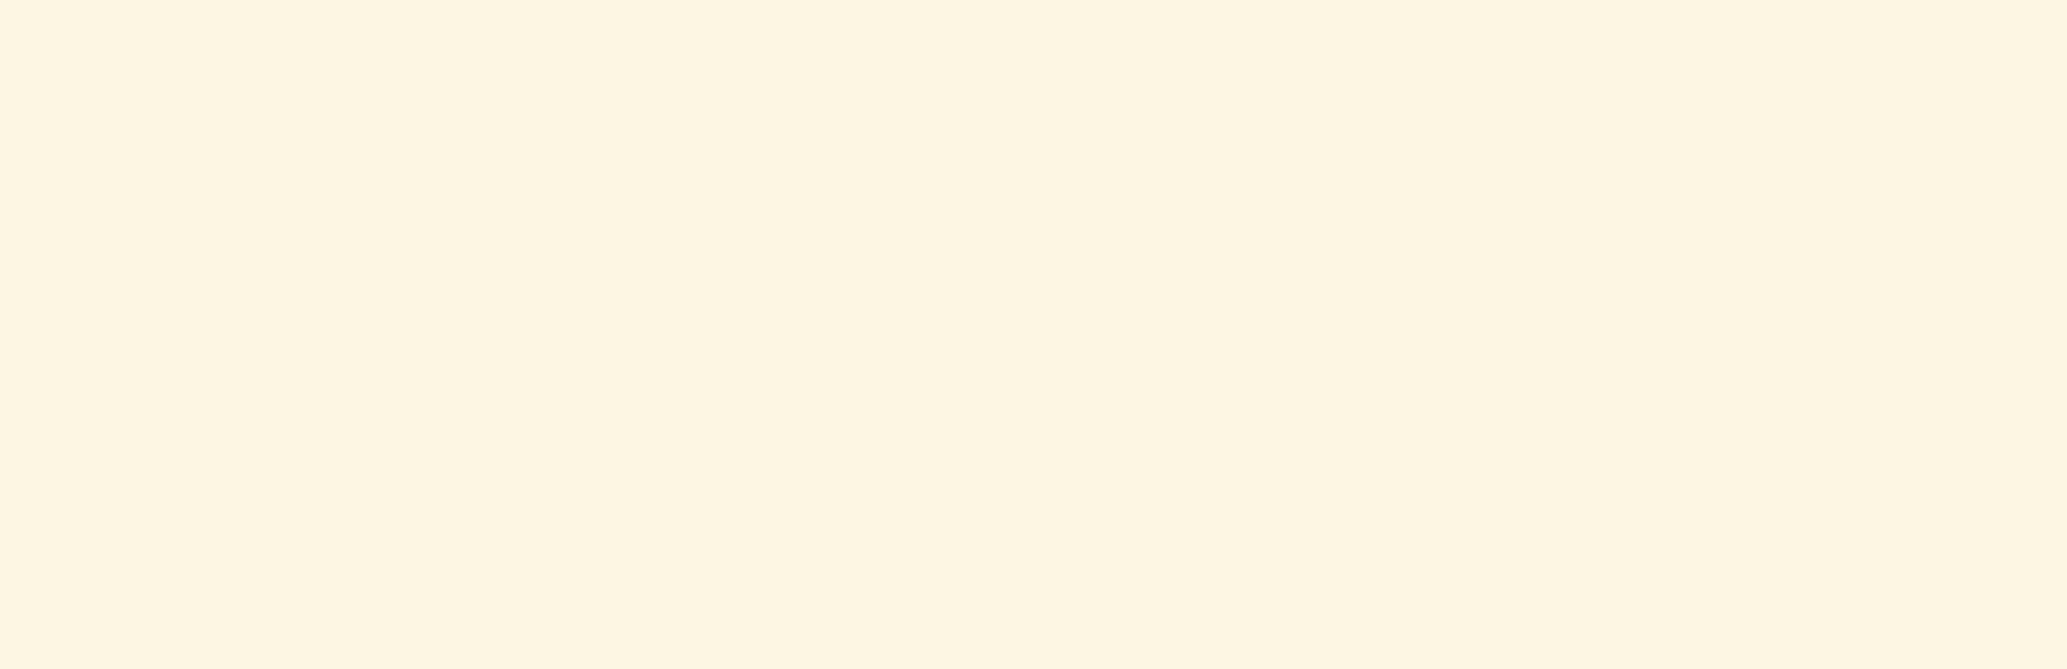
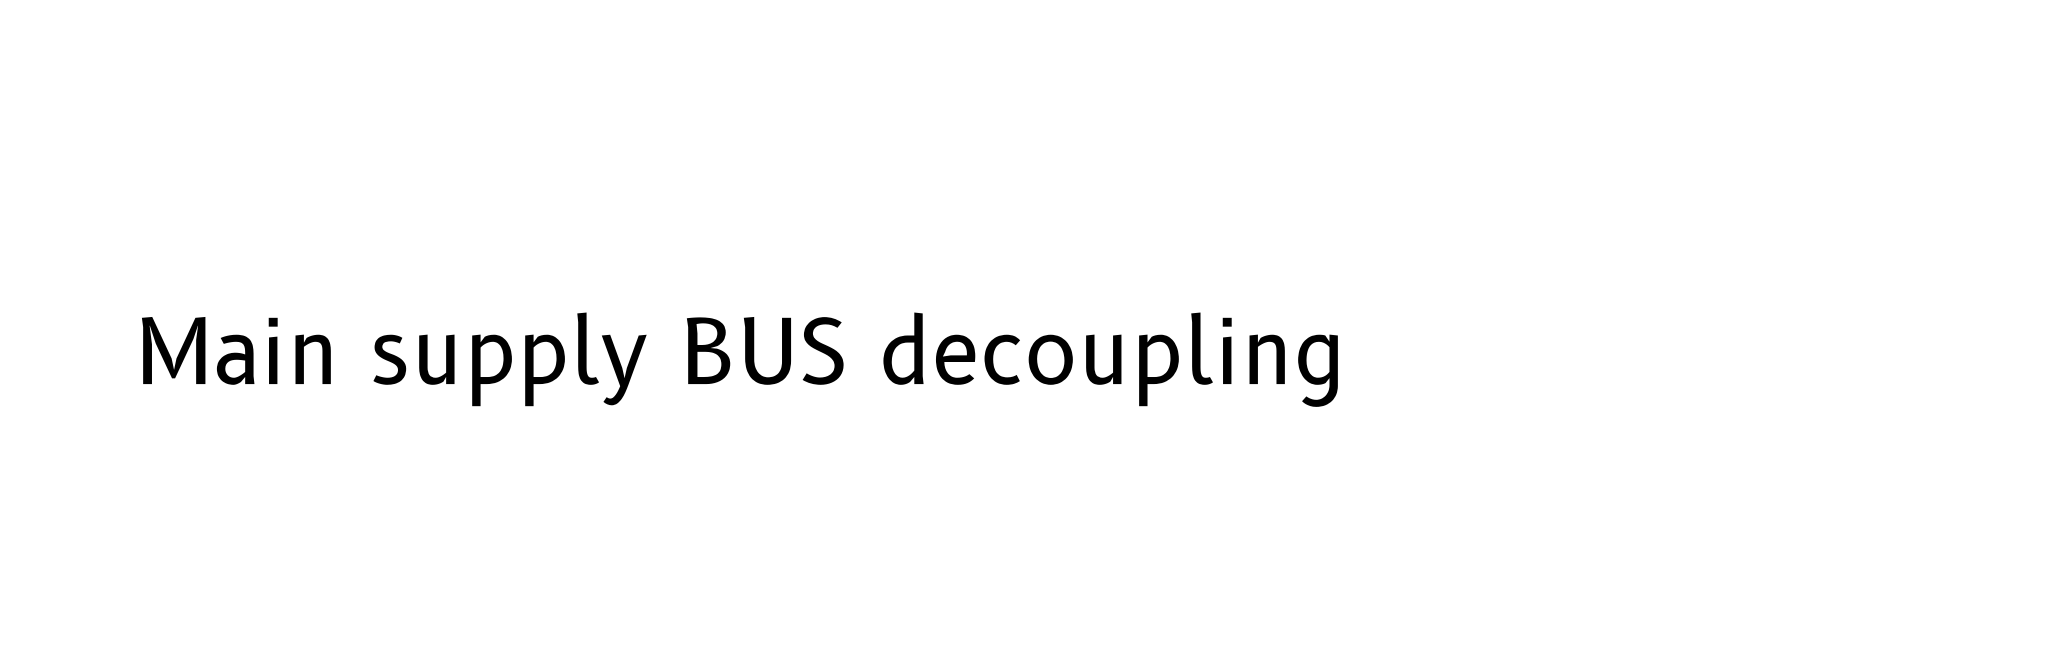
text: none -> Main supply BUS decoupling (739, 359)

